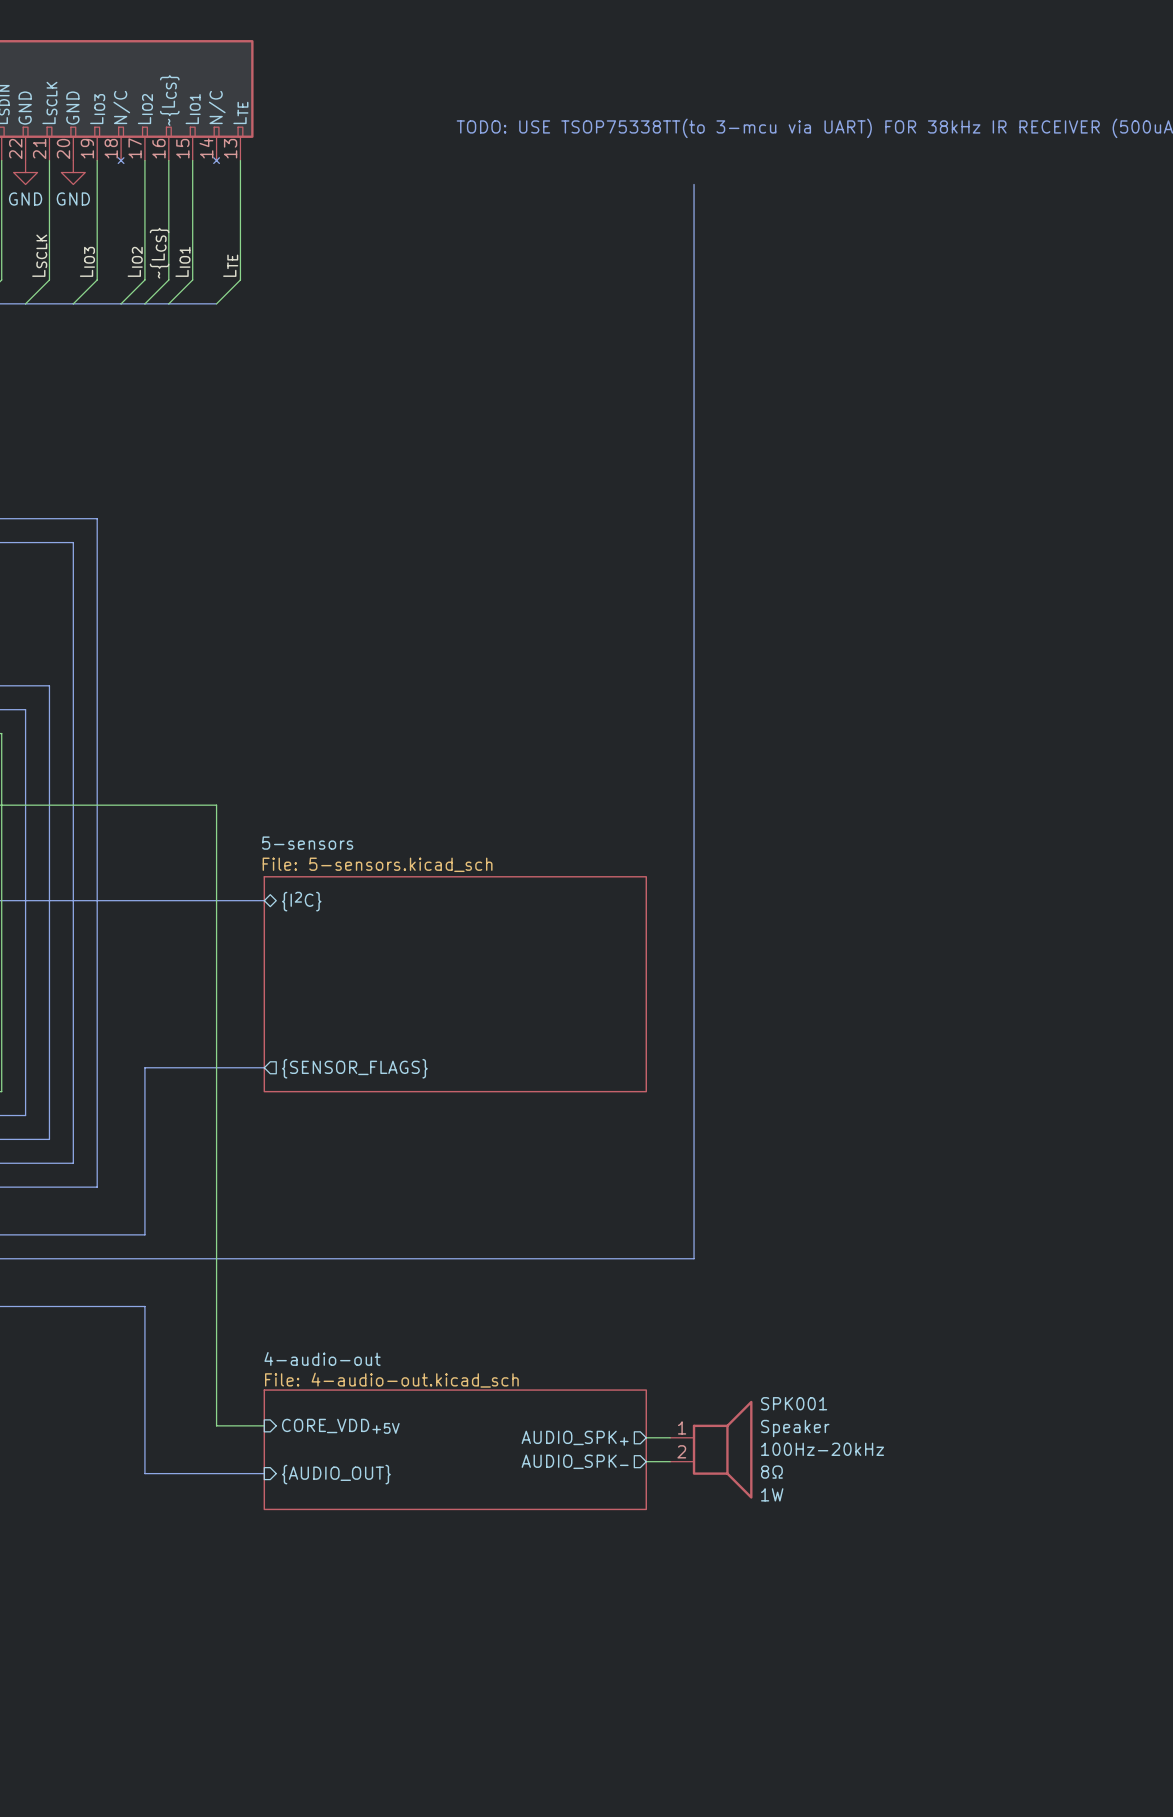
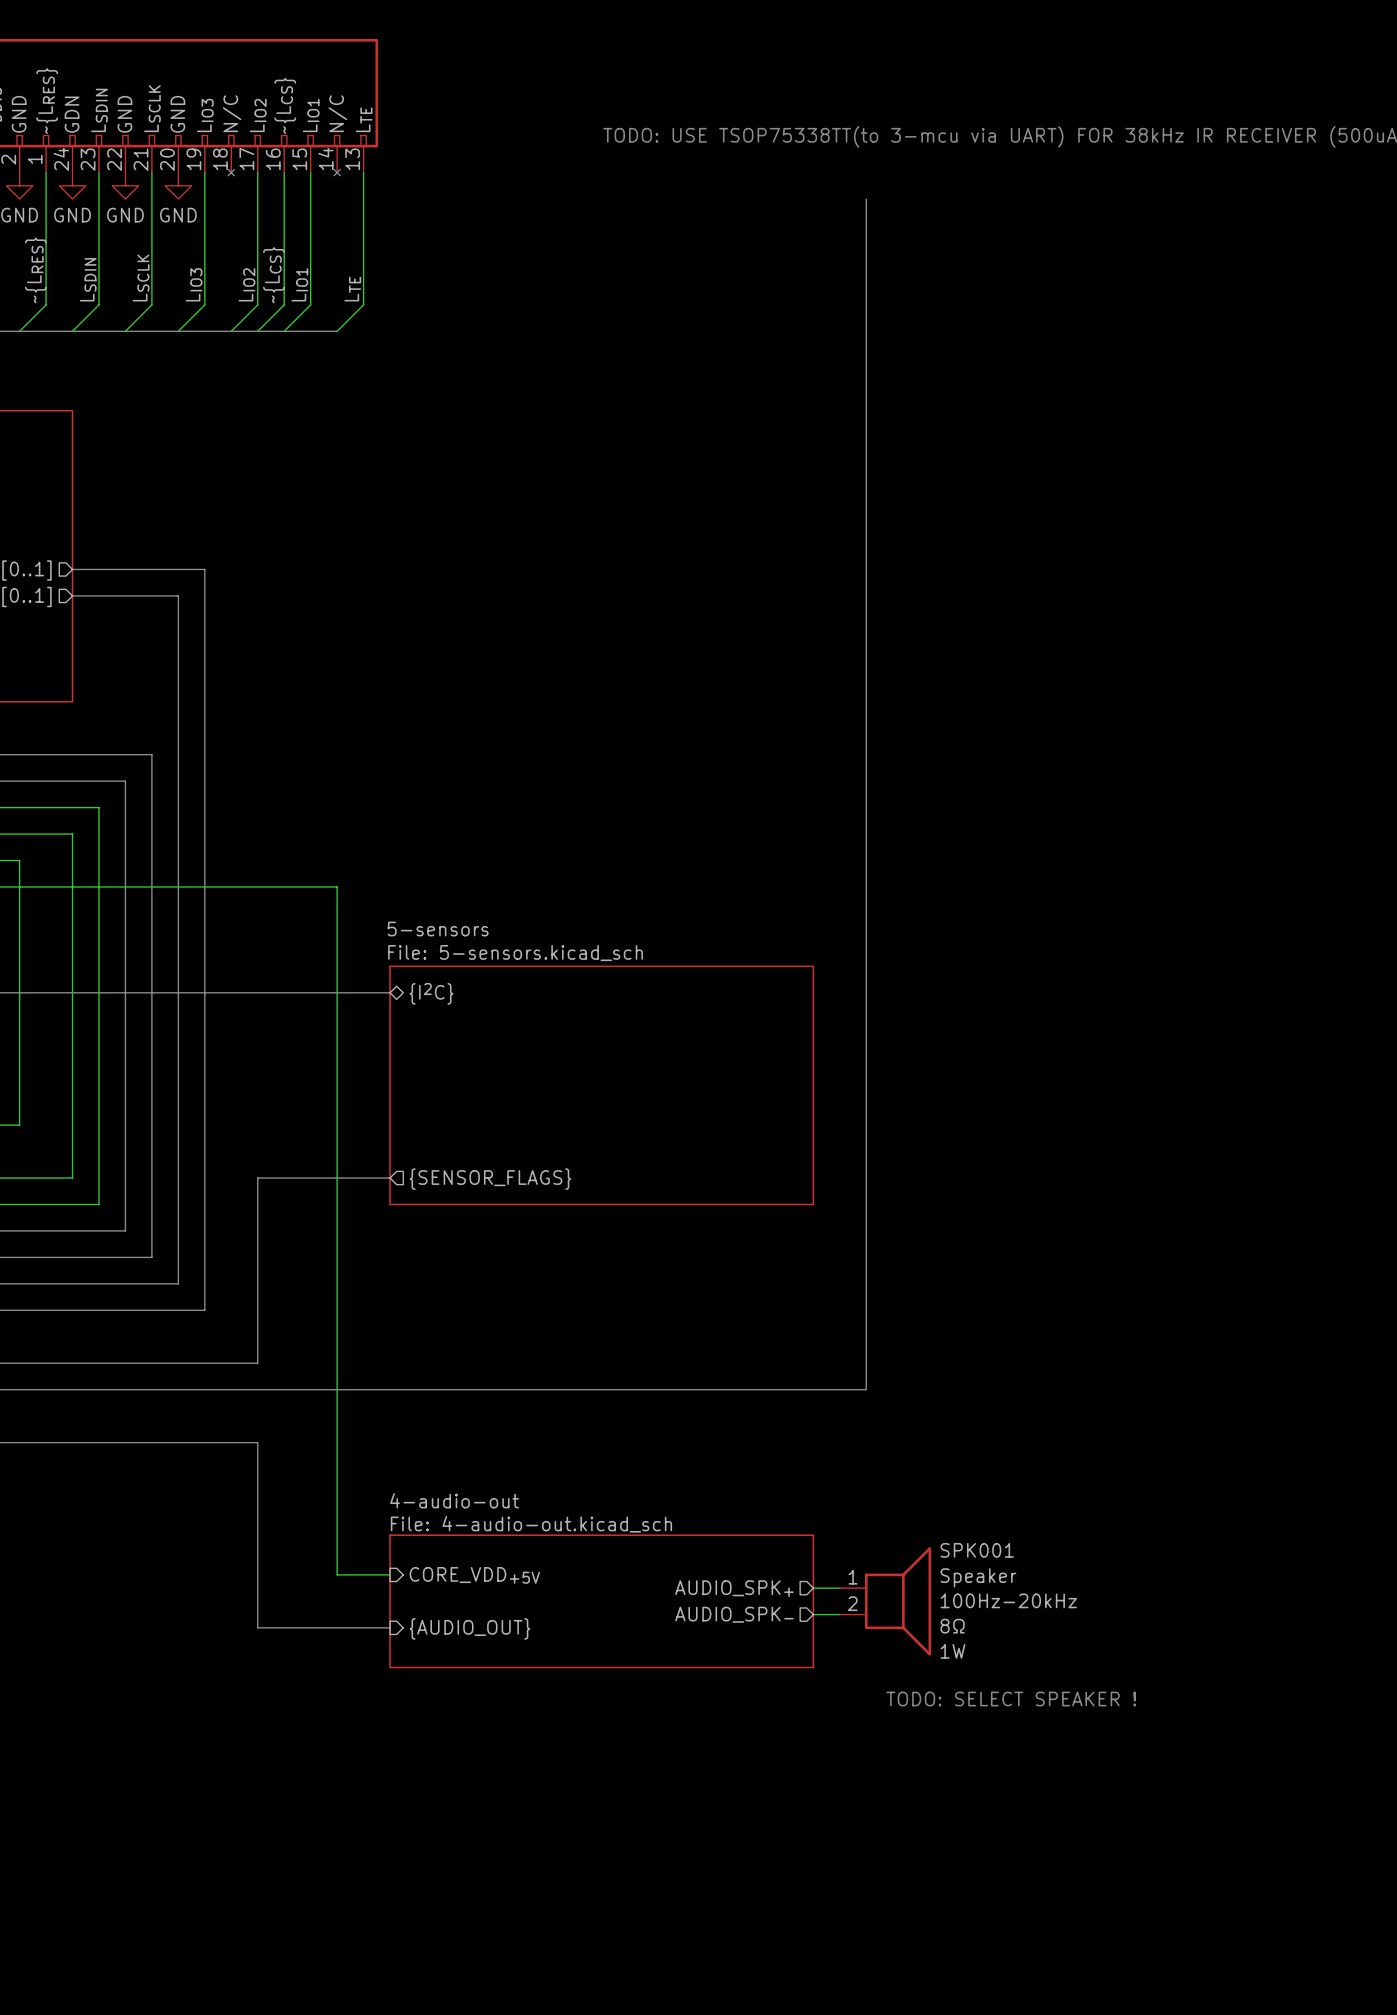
text: none -> TODO: SELECT SPEAKER ! (1011, 1699)

